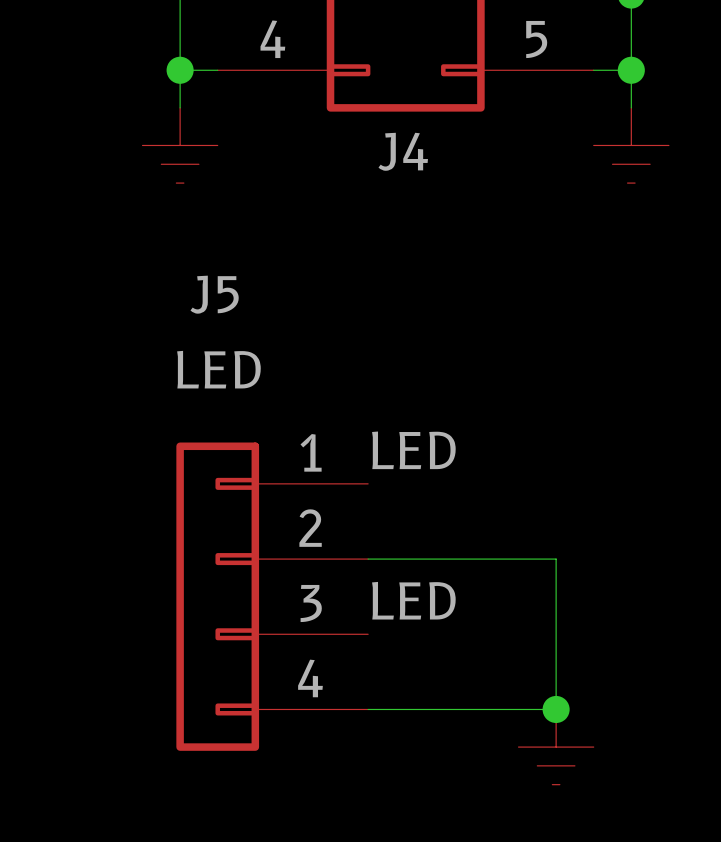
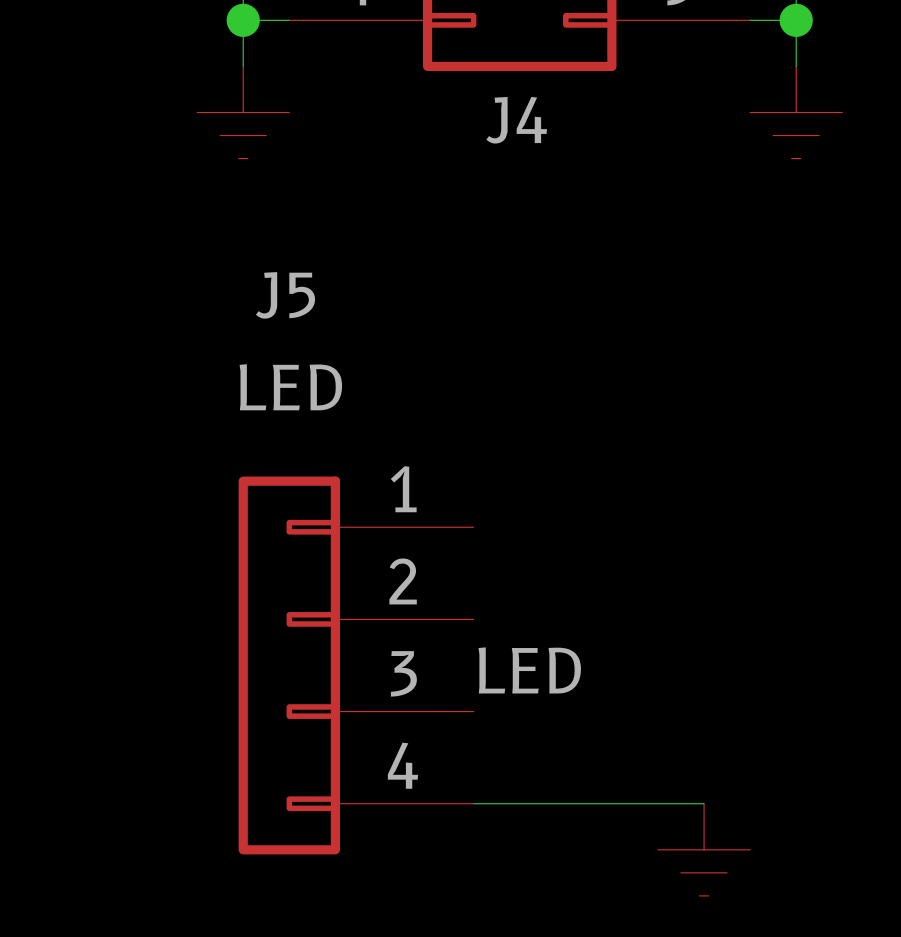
label: LED (413, 450) -> none
wire: (368, 559) (556, 559) (556, 709) -> none
junction: (556, 709) -> none

